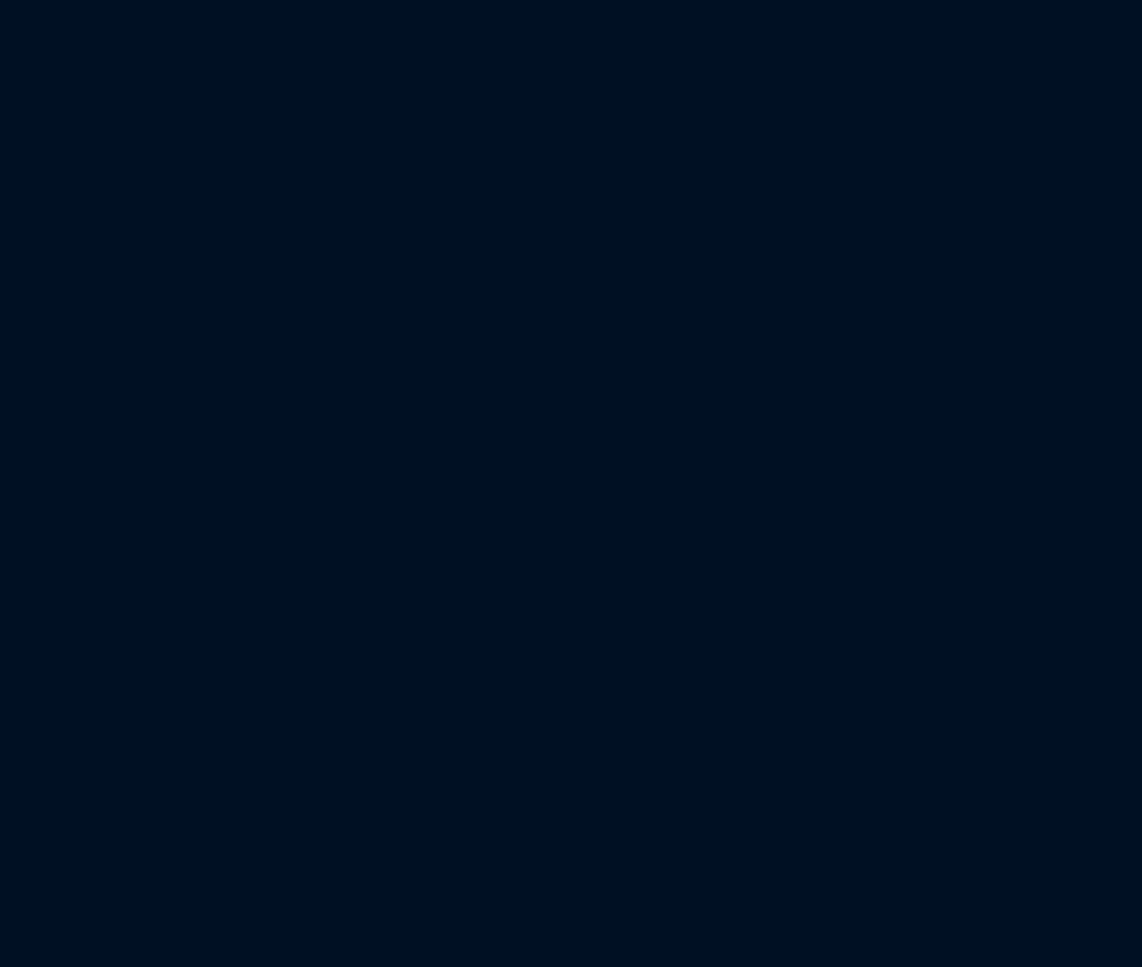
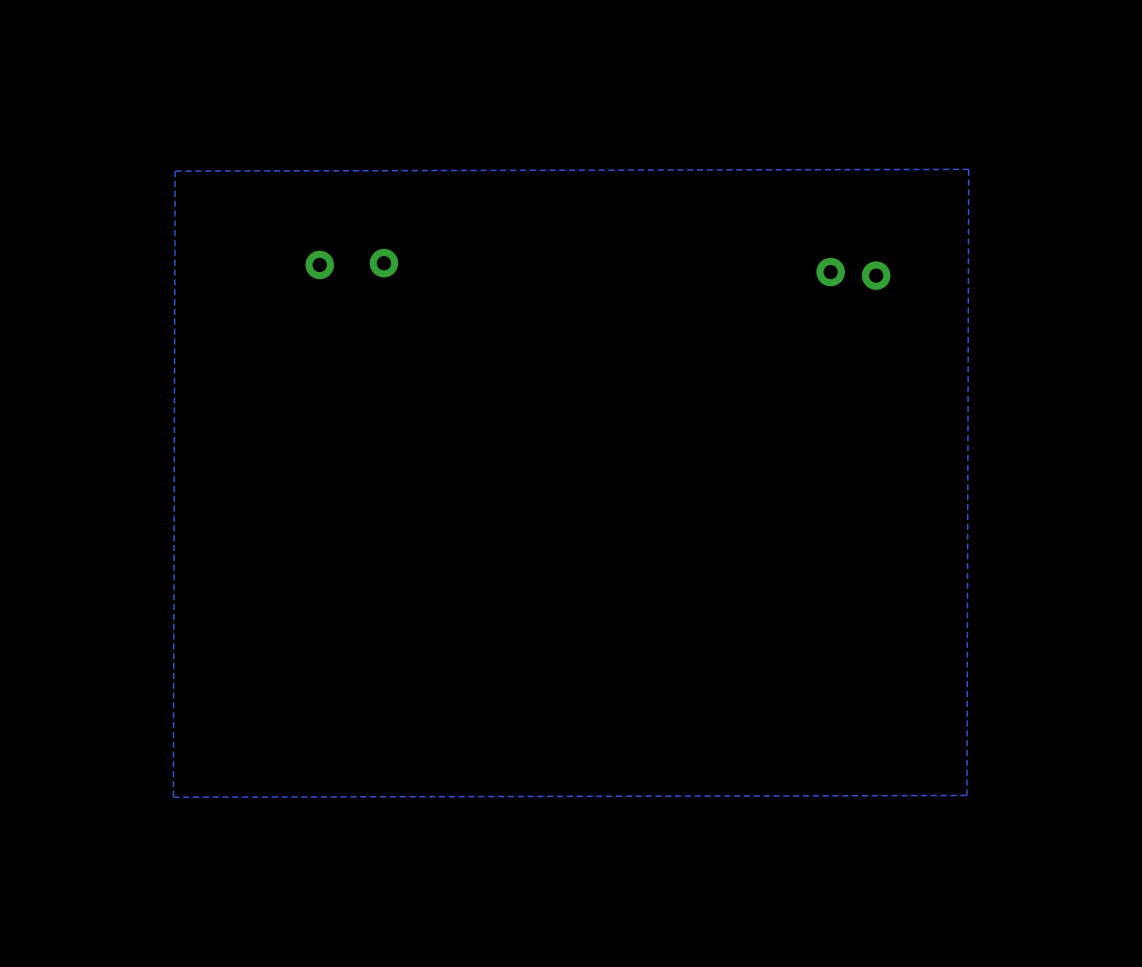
zone outline: none -> (968, 169) (175, 171) (173, 797) (966, 795) (968, 169)
via: none -> (383, 263)
via: none -> (319, 264)
via: none -> (830, 272)
via: none -> (876, 275)

